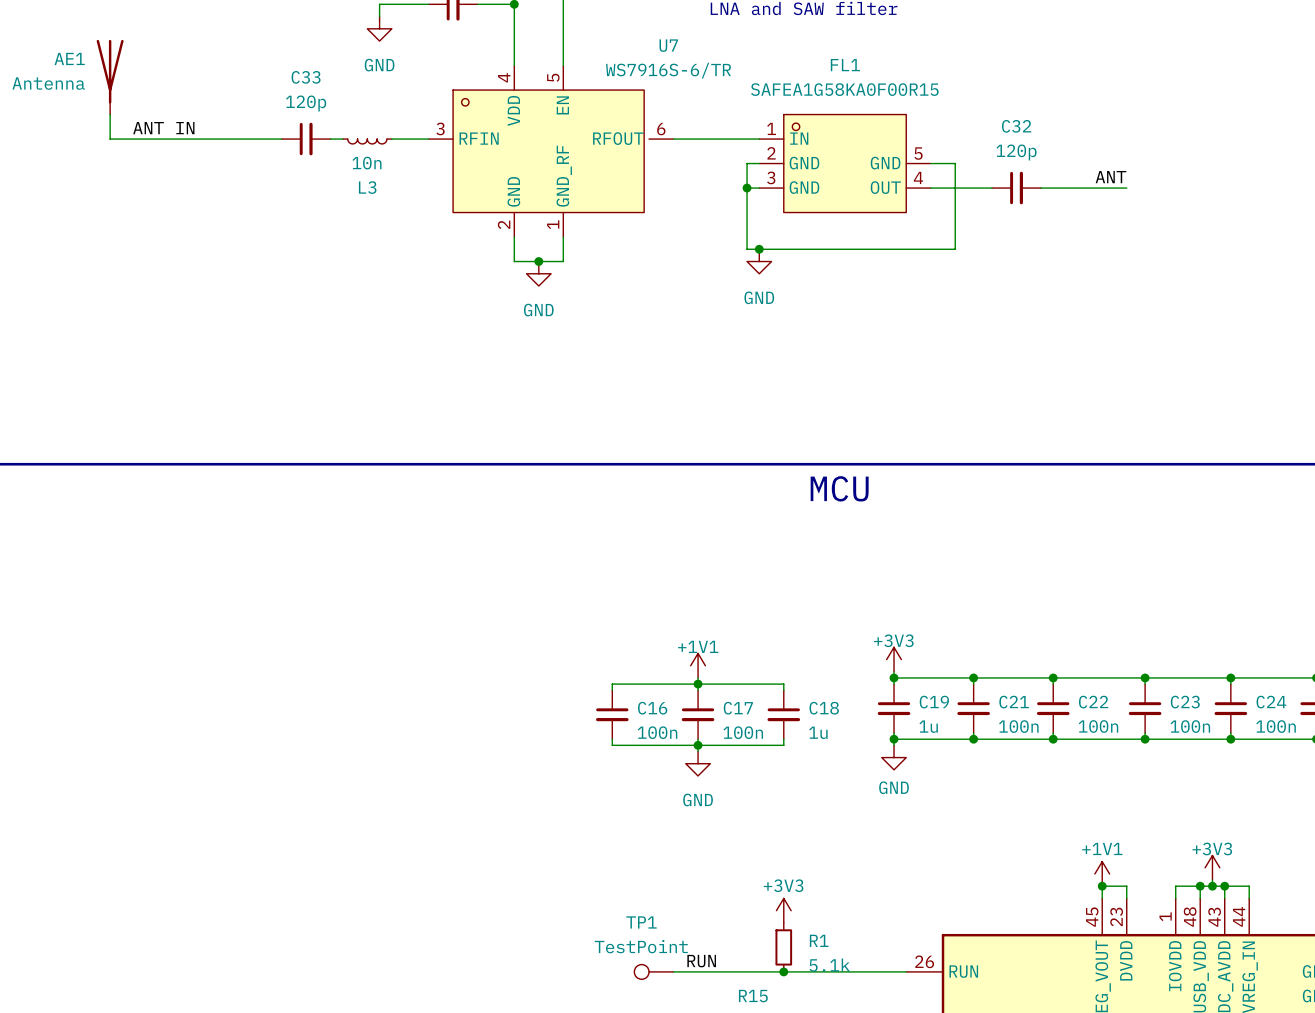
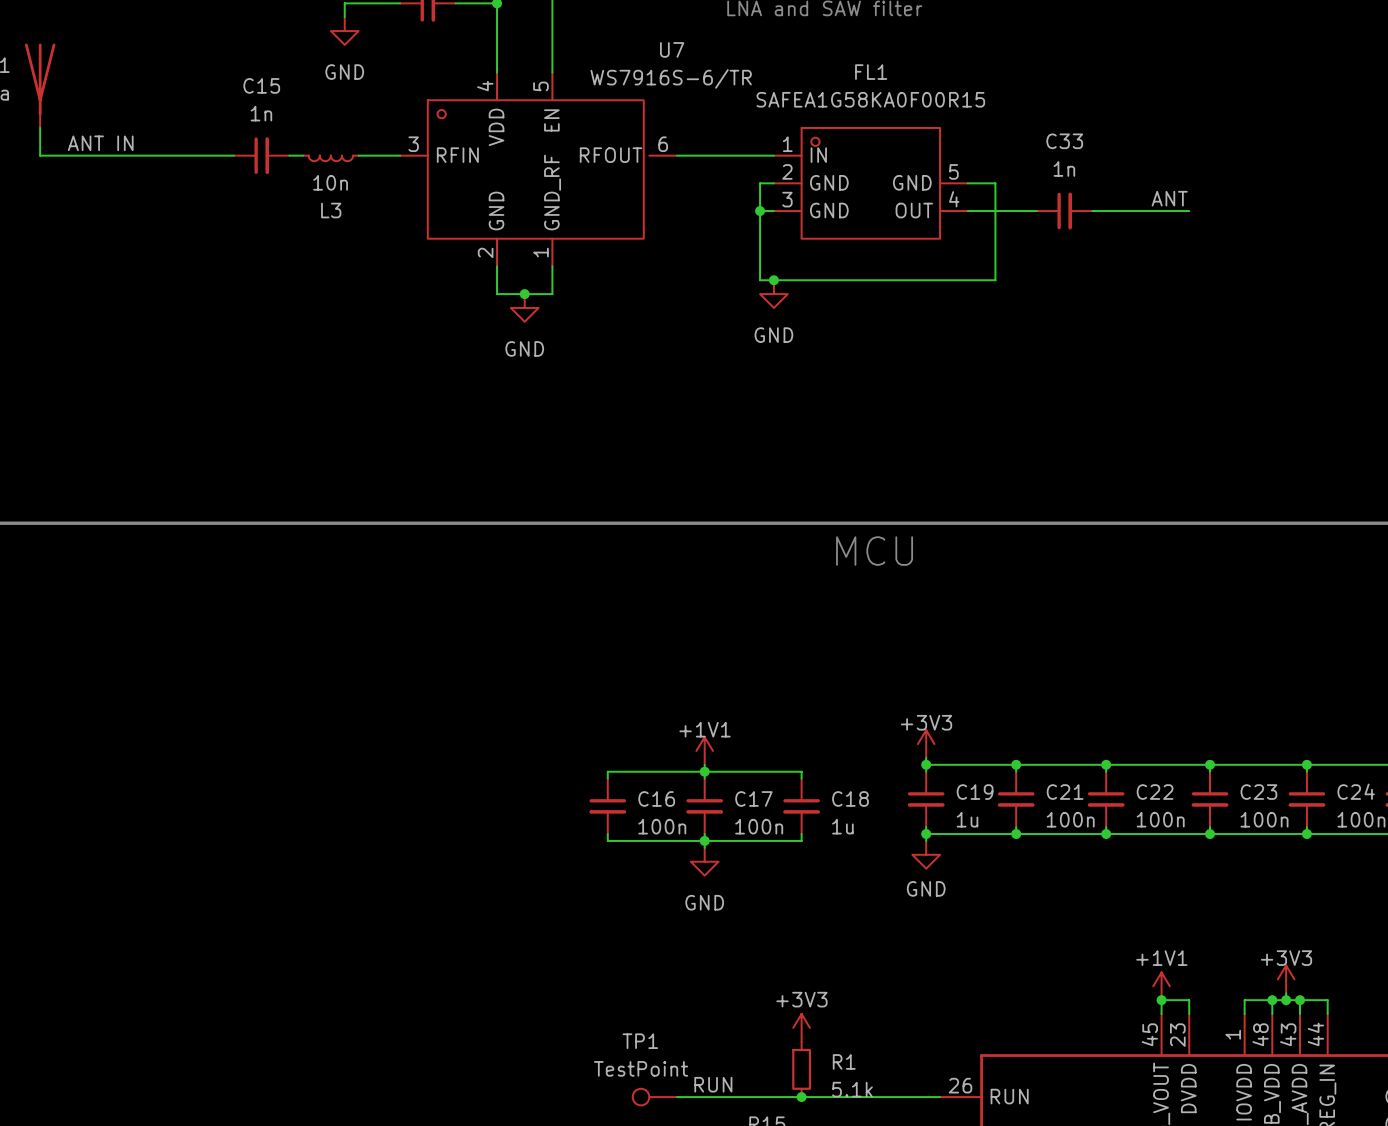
C33 name: C33 (306, 77) -> C15 (261, 85)
C33 value: 120p (306, 103) -> 1n (261, 113)
C32 name: C32 (1016, 126) -> C33 (1064, 141)
C32 value: 120p (1016, 152) -> 1n (1064, 168)

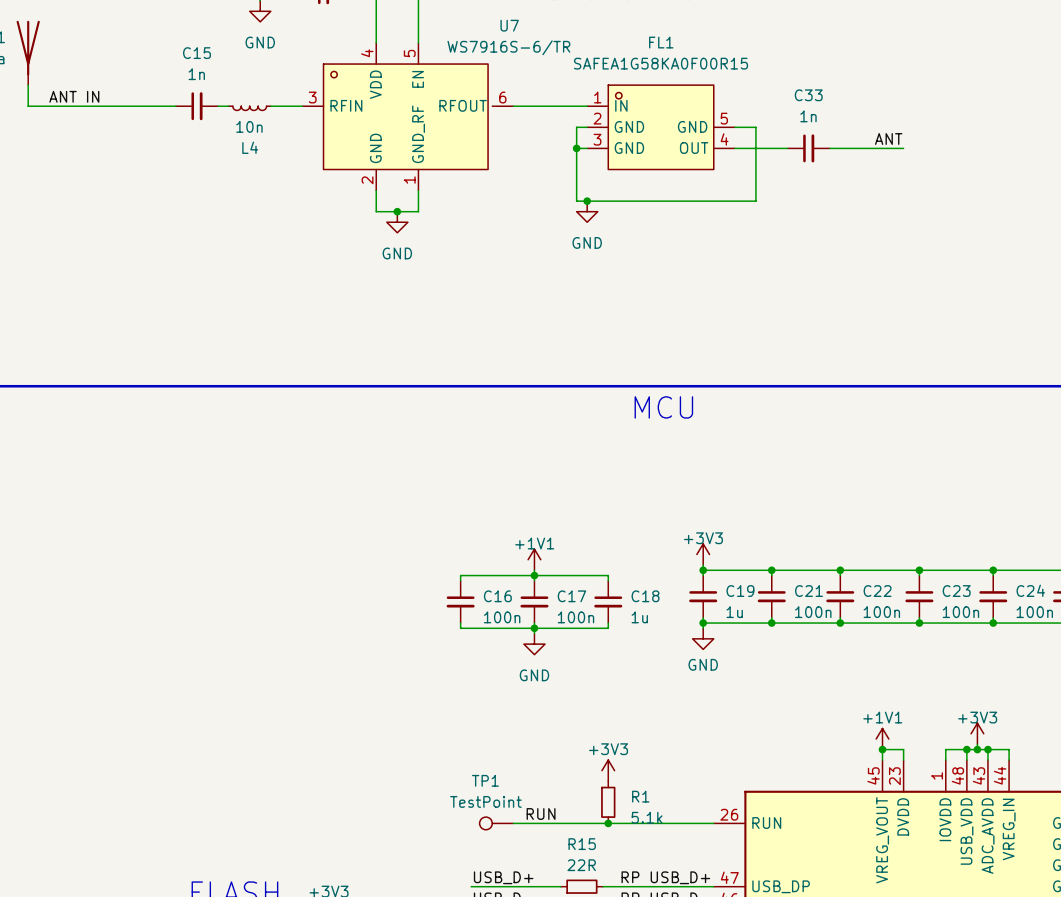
L3 name: L3 (331, 210) -> L4 (250, 147)

